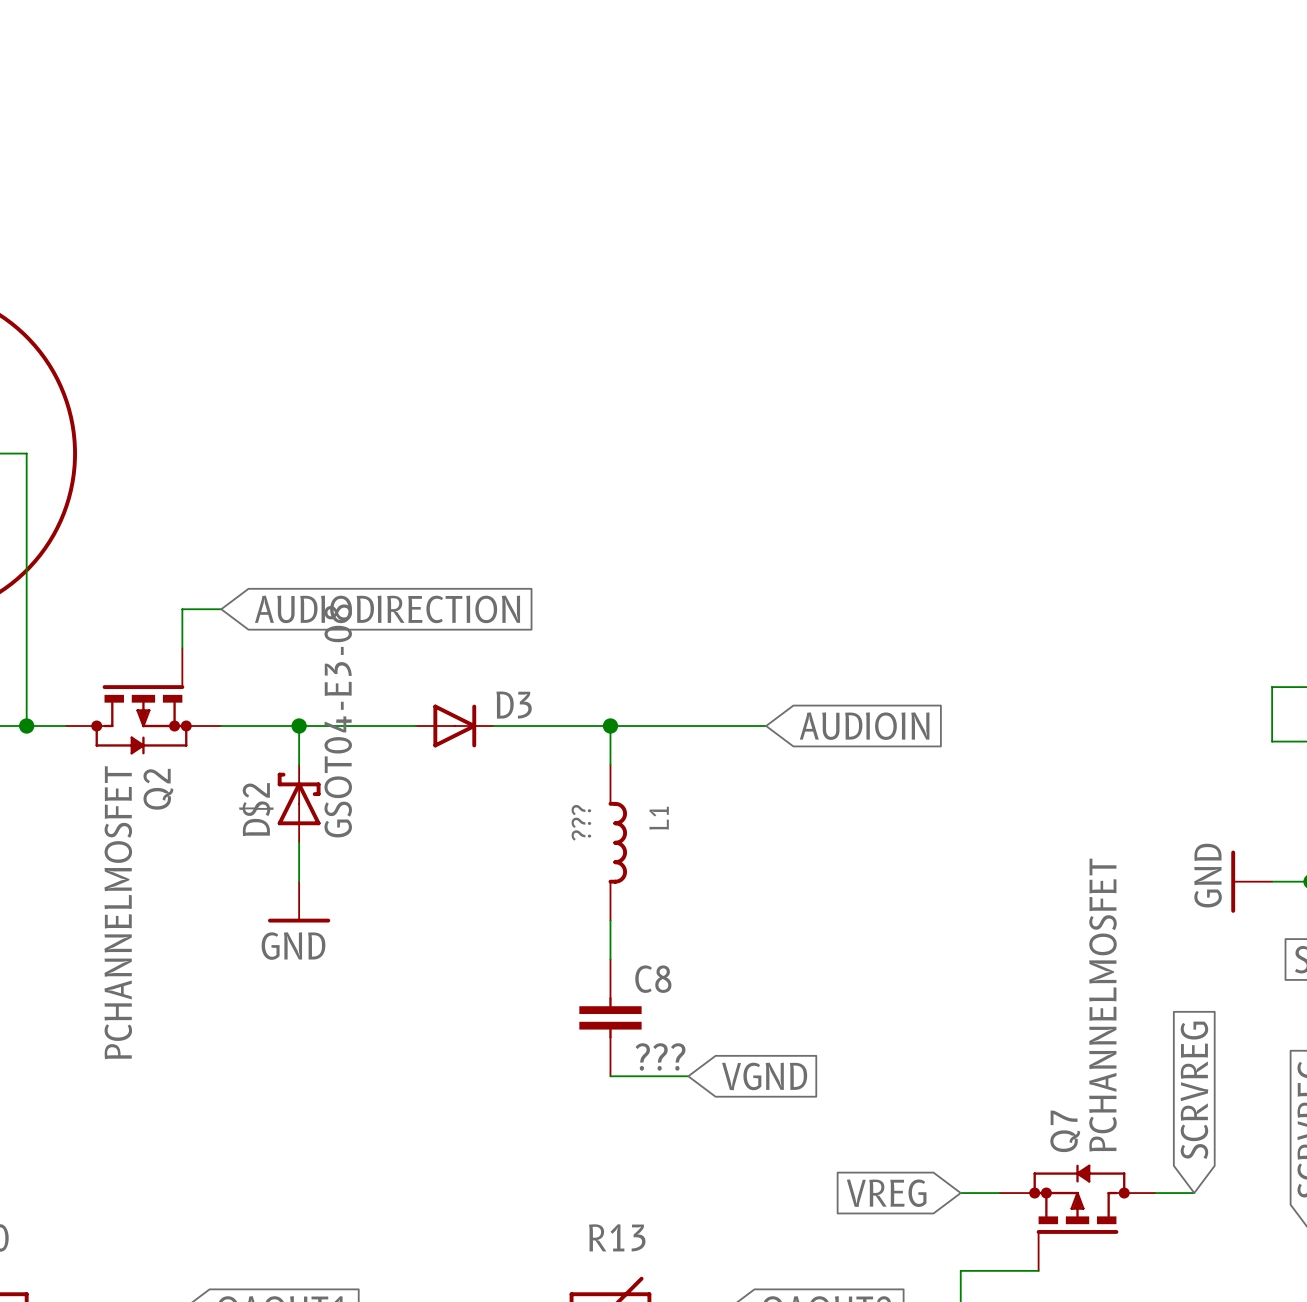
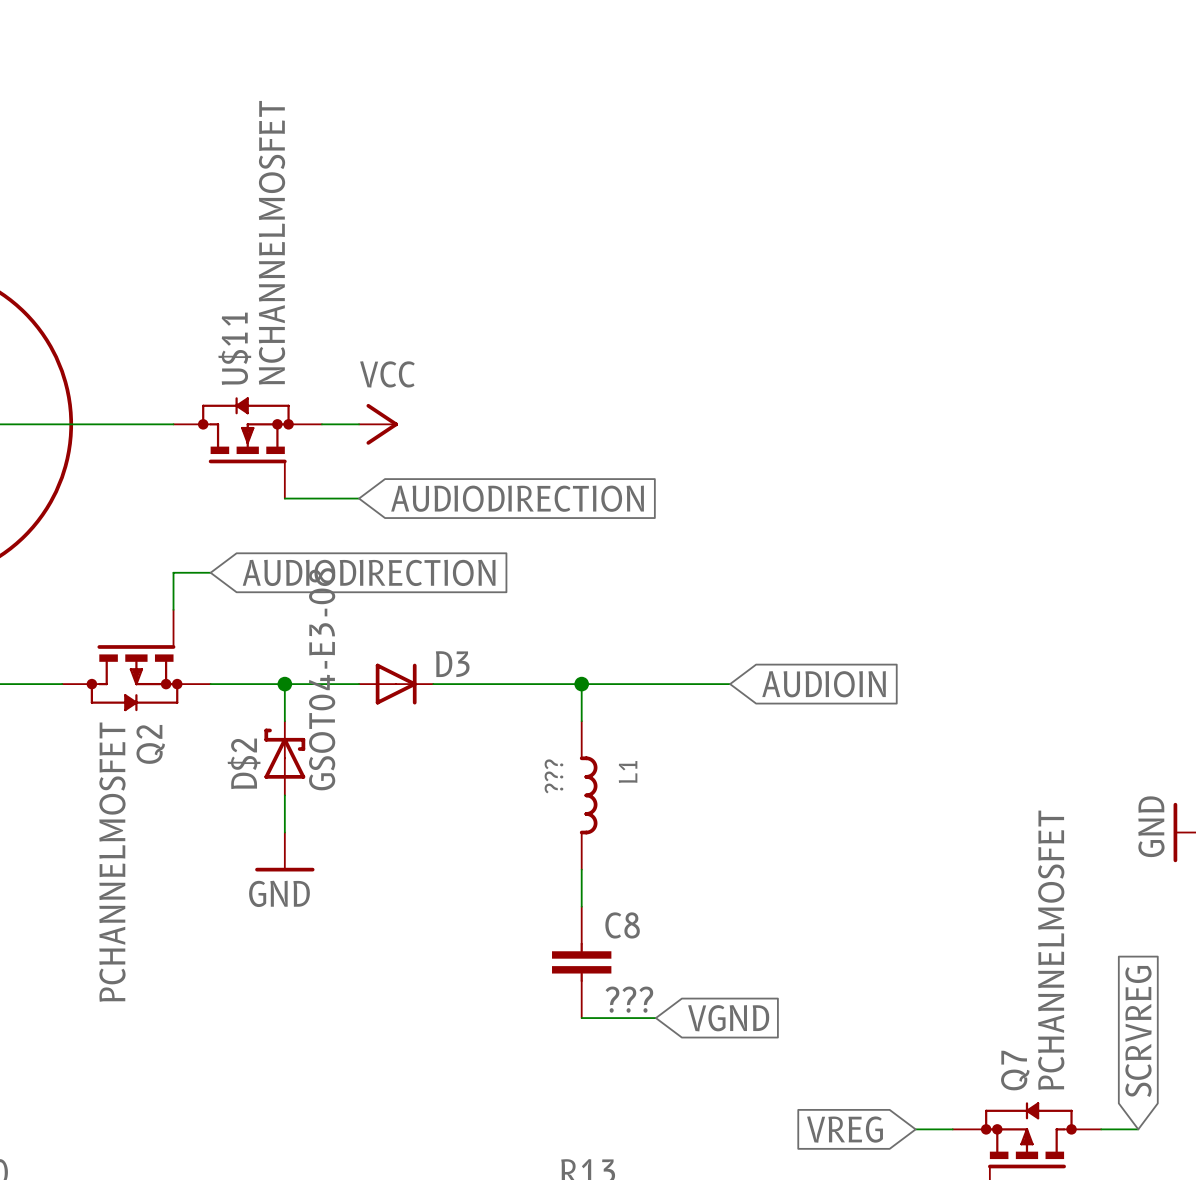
wire: (26, 453) (26, 726) -> (25, 424) (173, 424)
wire: none -> (321, 424) (359, 424)
power symbol: none -> VCC (378, 424)
U$11: none -> NCHANNELMOSFET (247, 447)
wire: none -> (284, 498) (359, 498)
global label: none -> AUDIODIRECTION (517, 498)
junction: (26, 726) -> none
D3 position: (454, 726) -> (396, 684)

